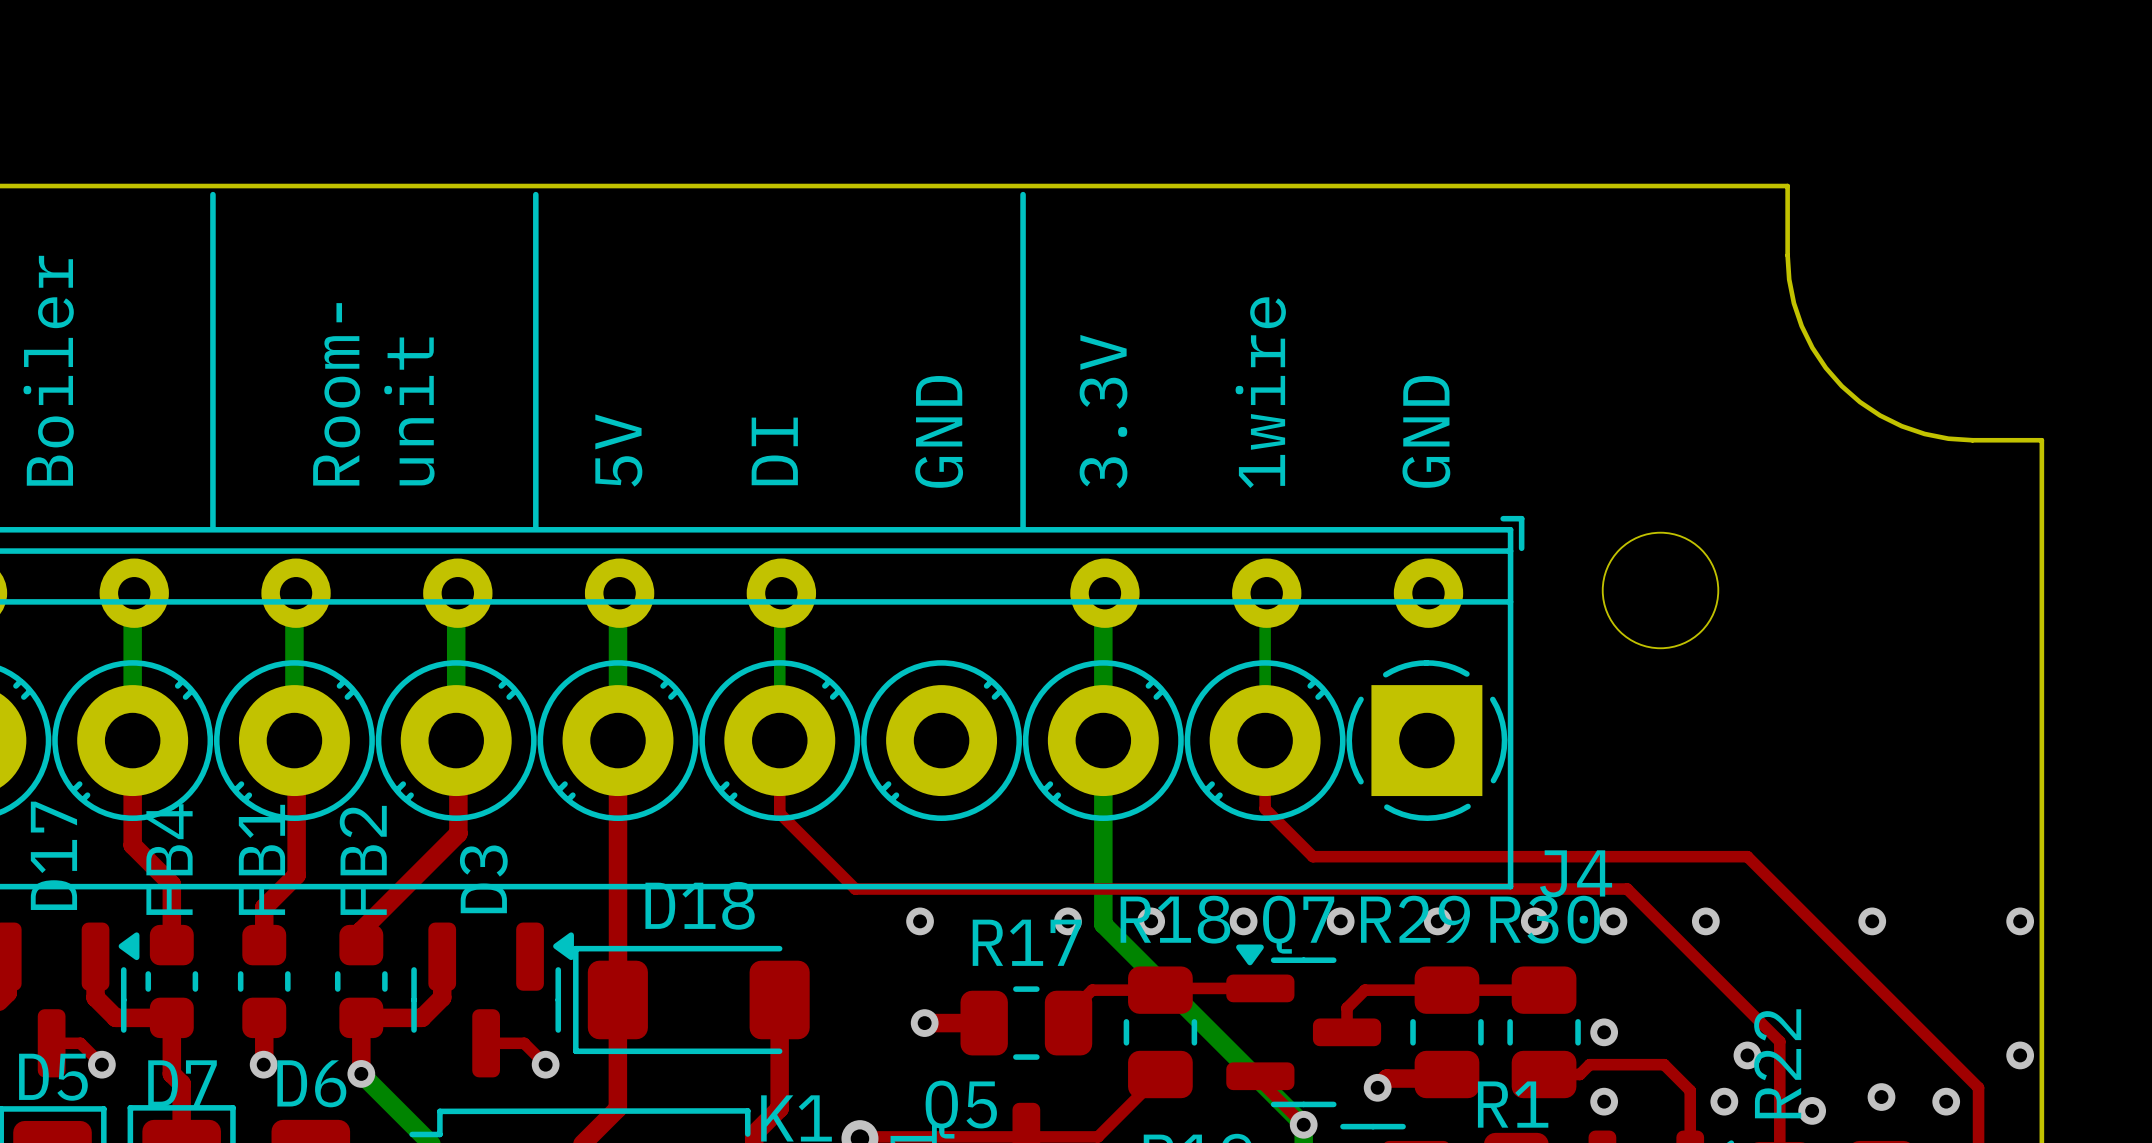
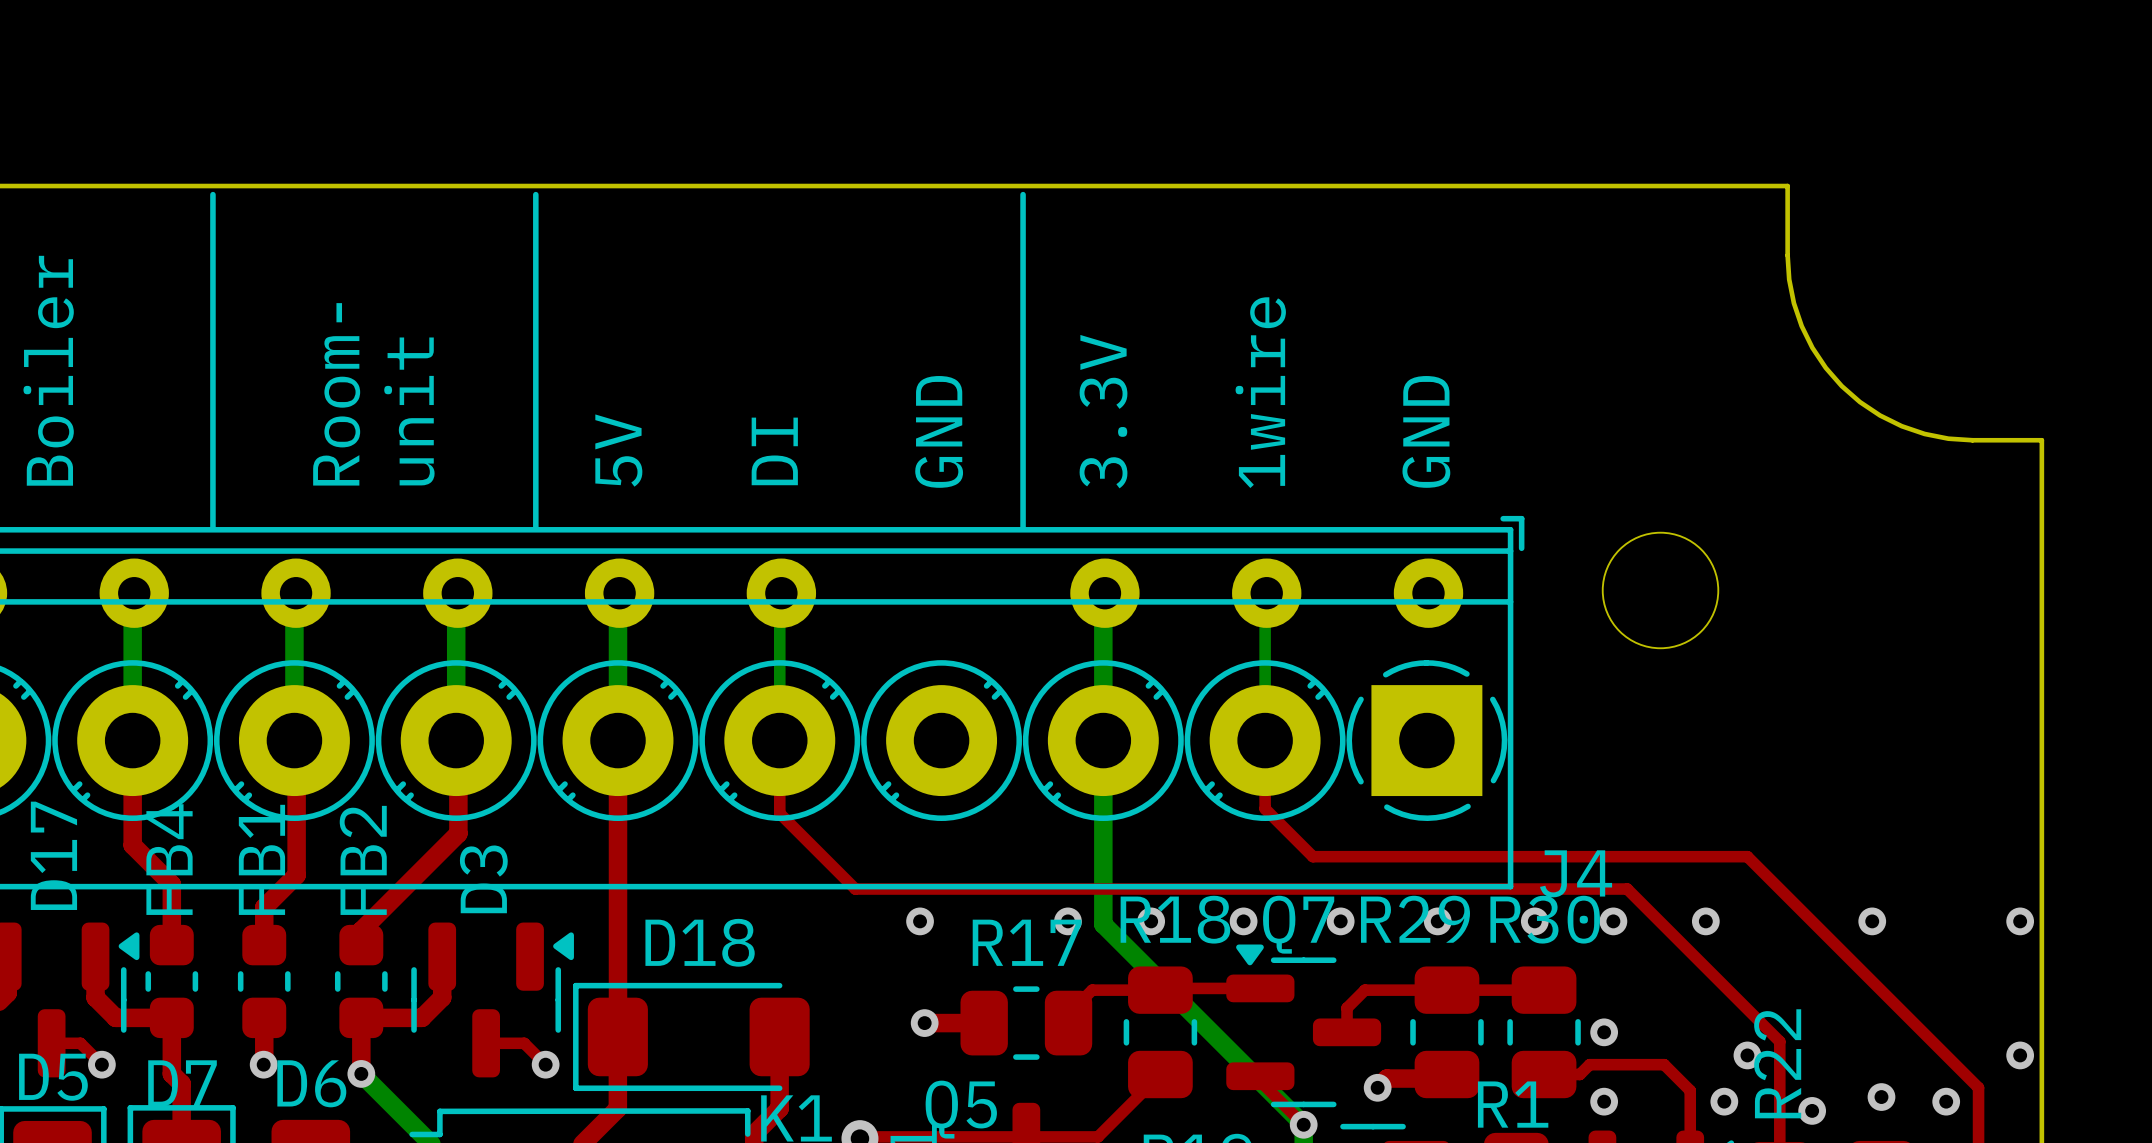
D18 position: (691, 999) -> (691, 1036)

